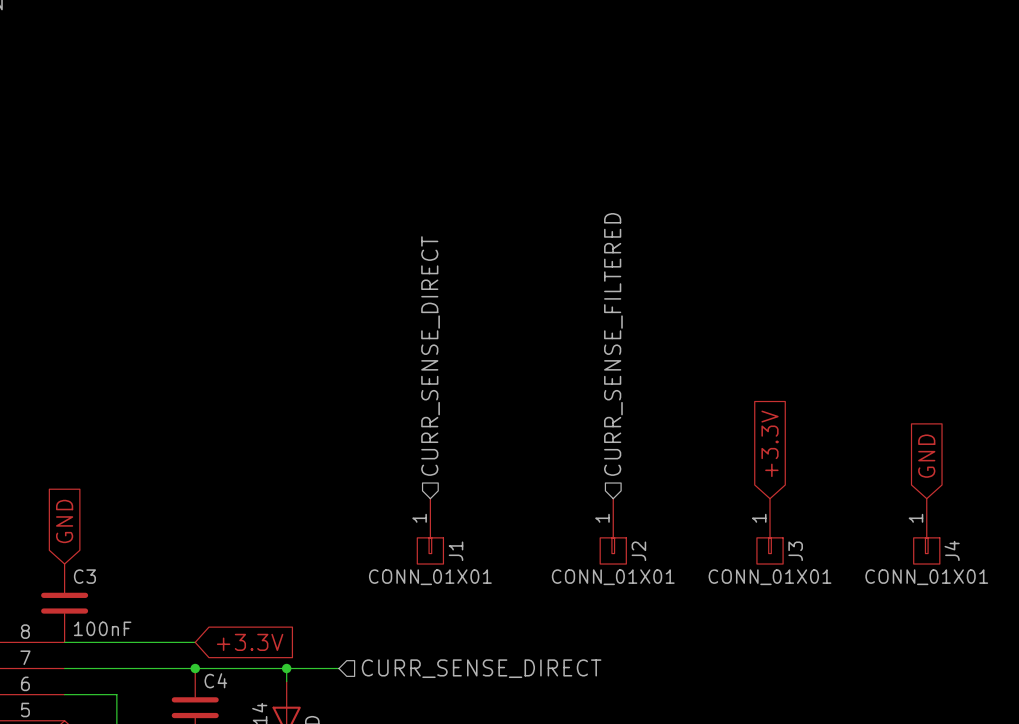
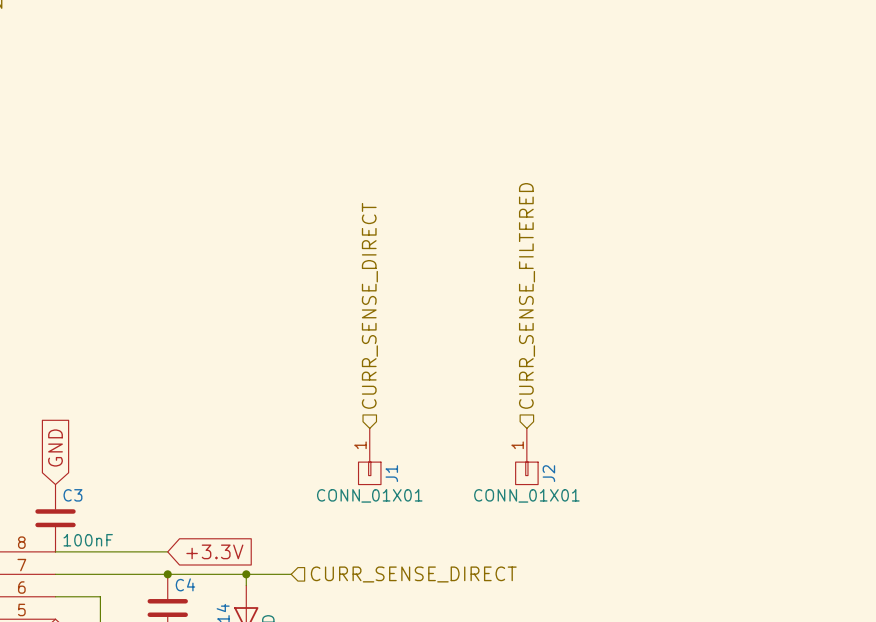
global label: +3.3V (770, 443) -> none
global label: GND (926, 456) -> none
J3: CONN_01X01 (770, 531) -> none
J4: CONN_01X01 (926, 531) -> none

